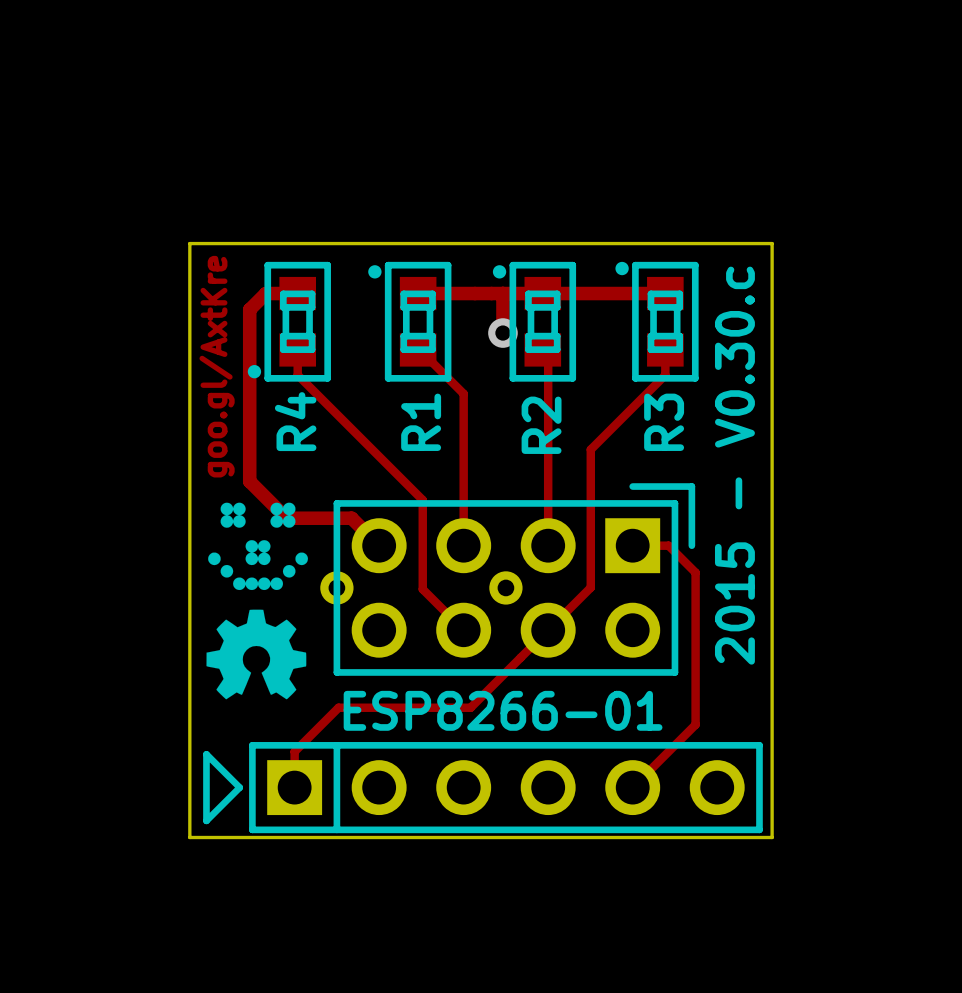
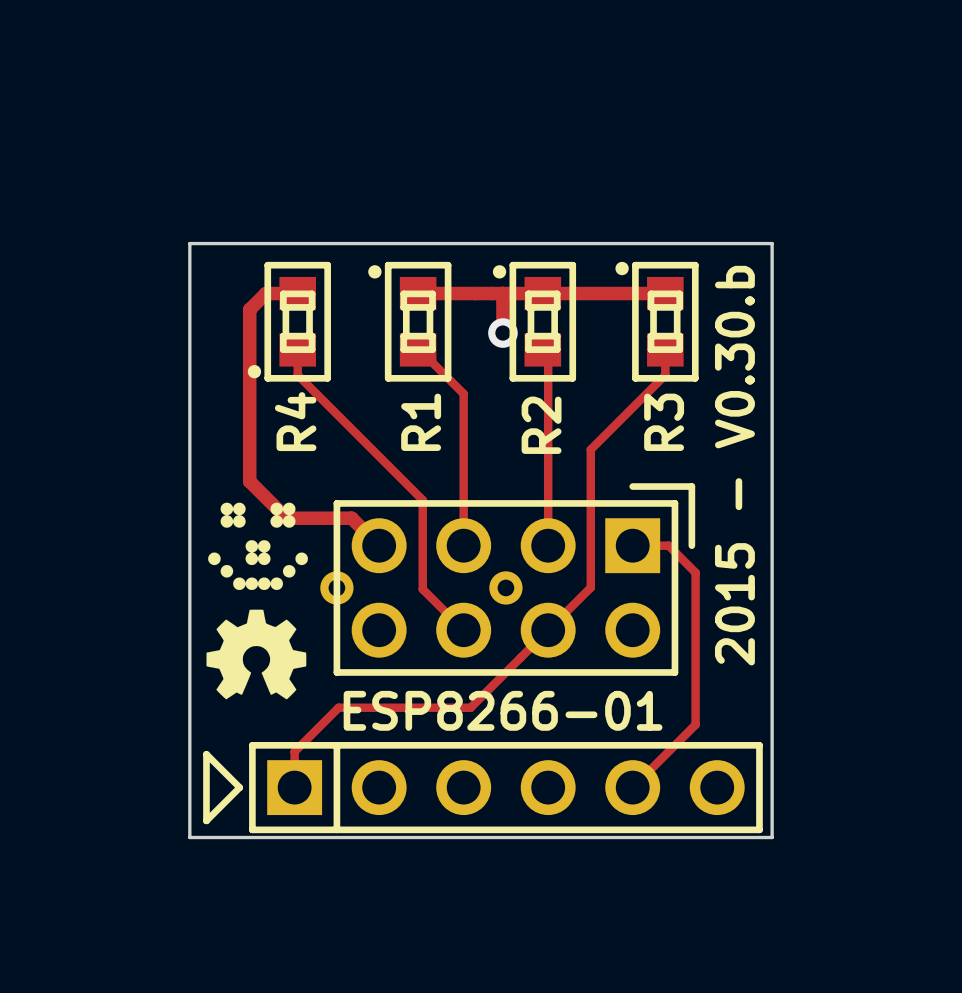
text: goo.gl/AxtKre (217, 366) -> none
text: 2015 - V0.30.c (734, 465) -> 2015 - V0.30.b (734, 465)

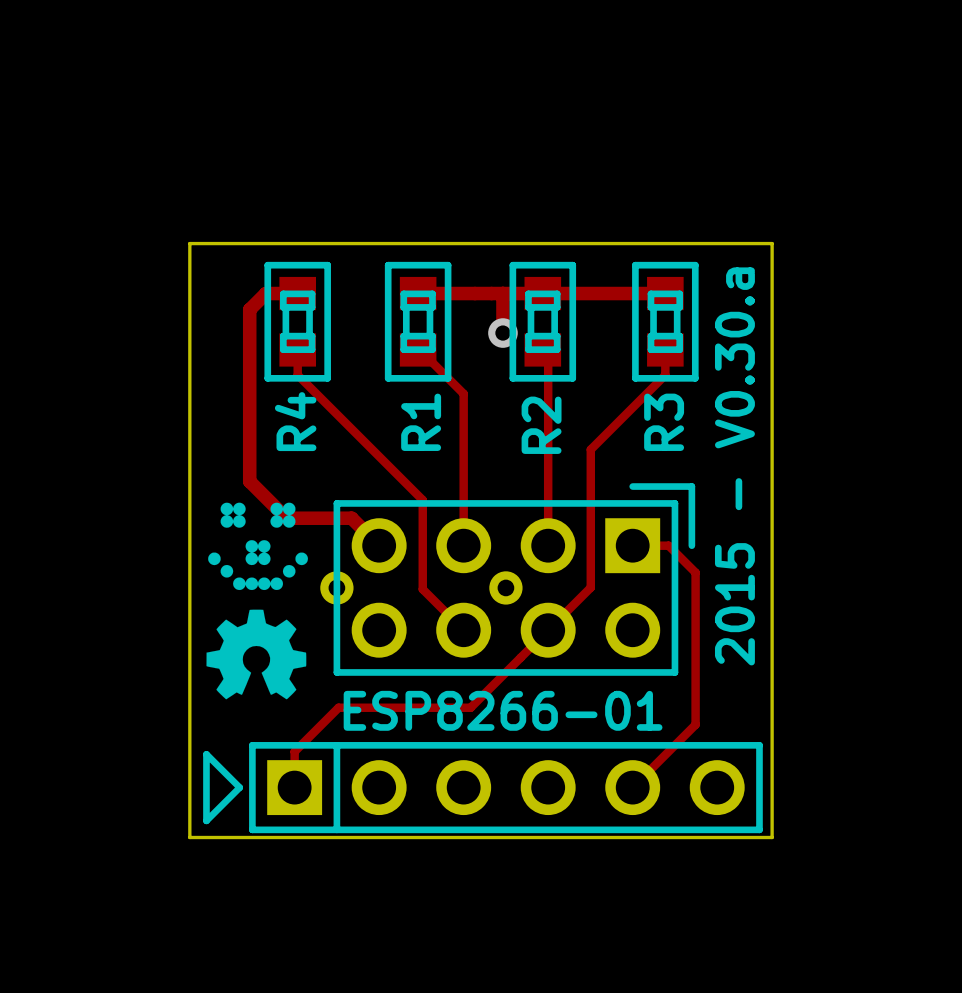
R4 footprint: [247, 261, 331, 382] -> [264, 261, 331, 382]
R1 footprint: [368, 261, 452, 382] -> [384, 261, 452, 382]
R2 footprint: [492, 261, 577, 382] -> [509, 261, 577, 382]
R3 footprint: [615, 261, 699, 382] -> [632, 261, 699, 382]
text: 2015 - V0.30.b (734, 465) -> 2015 - V0.30.a (734, 466)

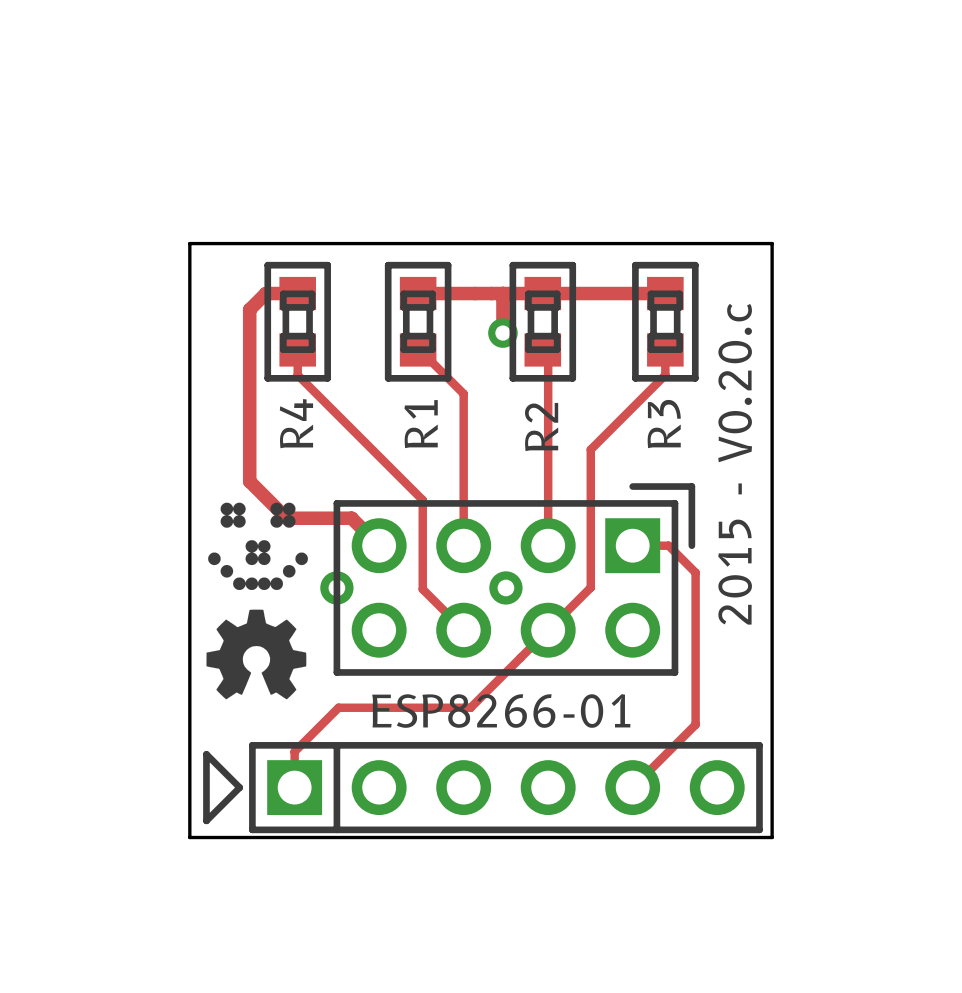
text: 2015 - V0.30.a (734, 466) -> 2015 - V0.20.c (735, 464)

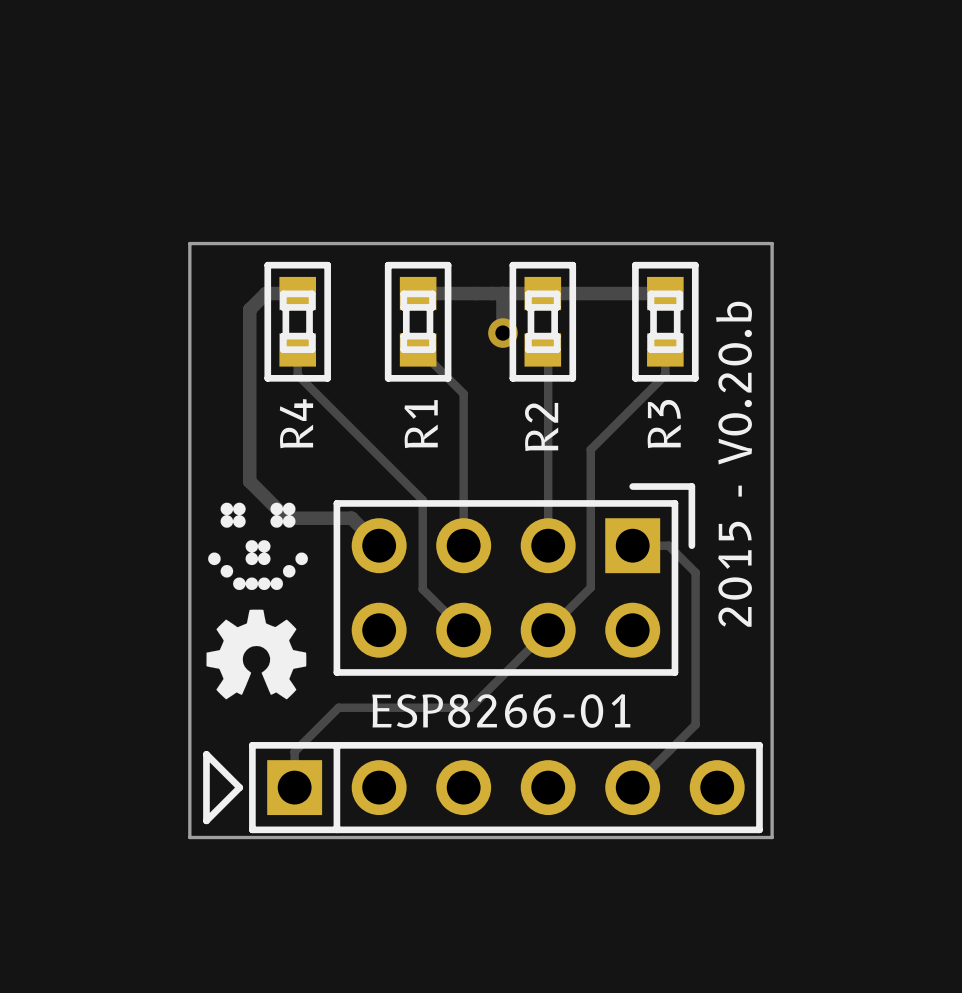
text: 2015 - V0.20.c (735, 464) -> 2015 - V0.20.b (734, 464)
part footprint: [320, 483, 696, 676] -> [333, 483, 696, 676]

